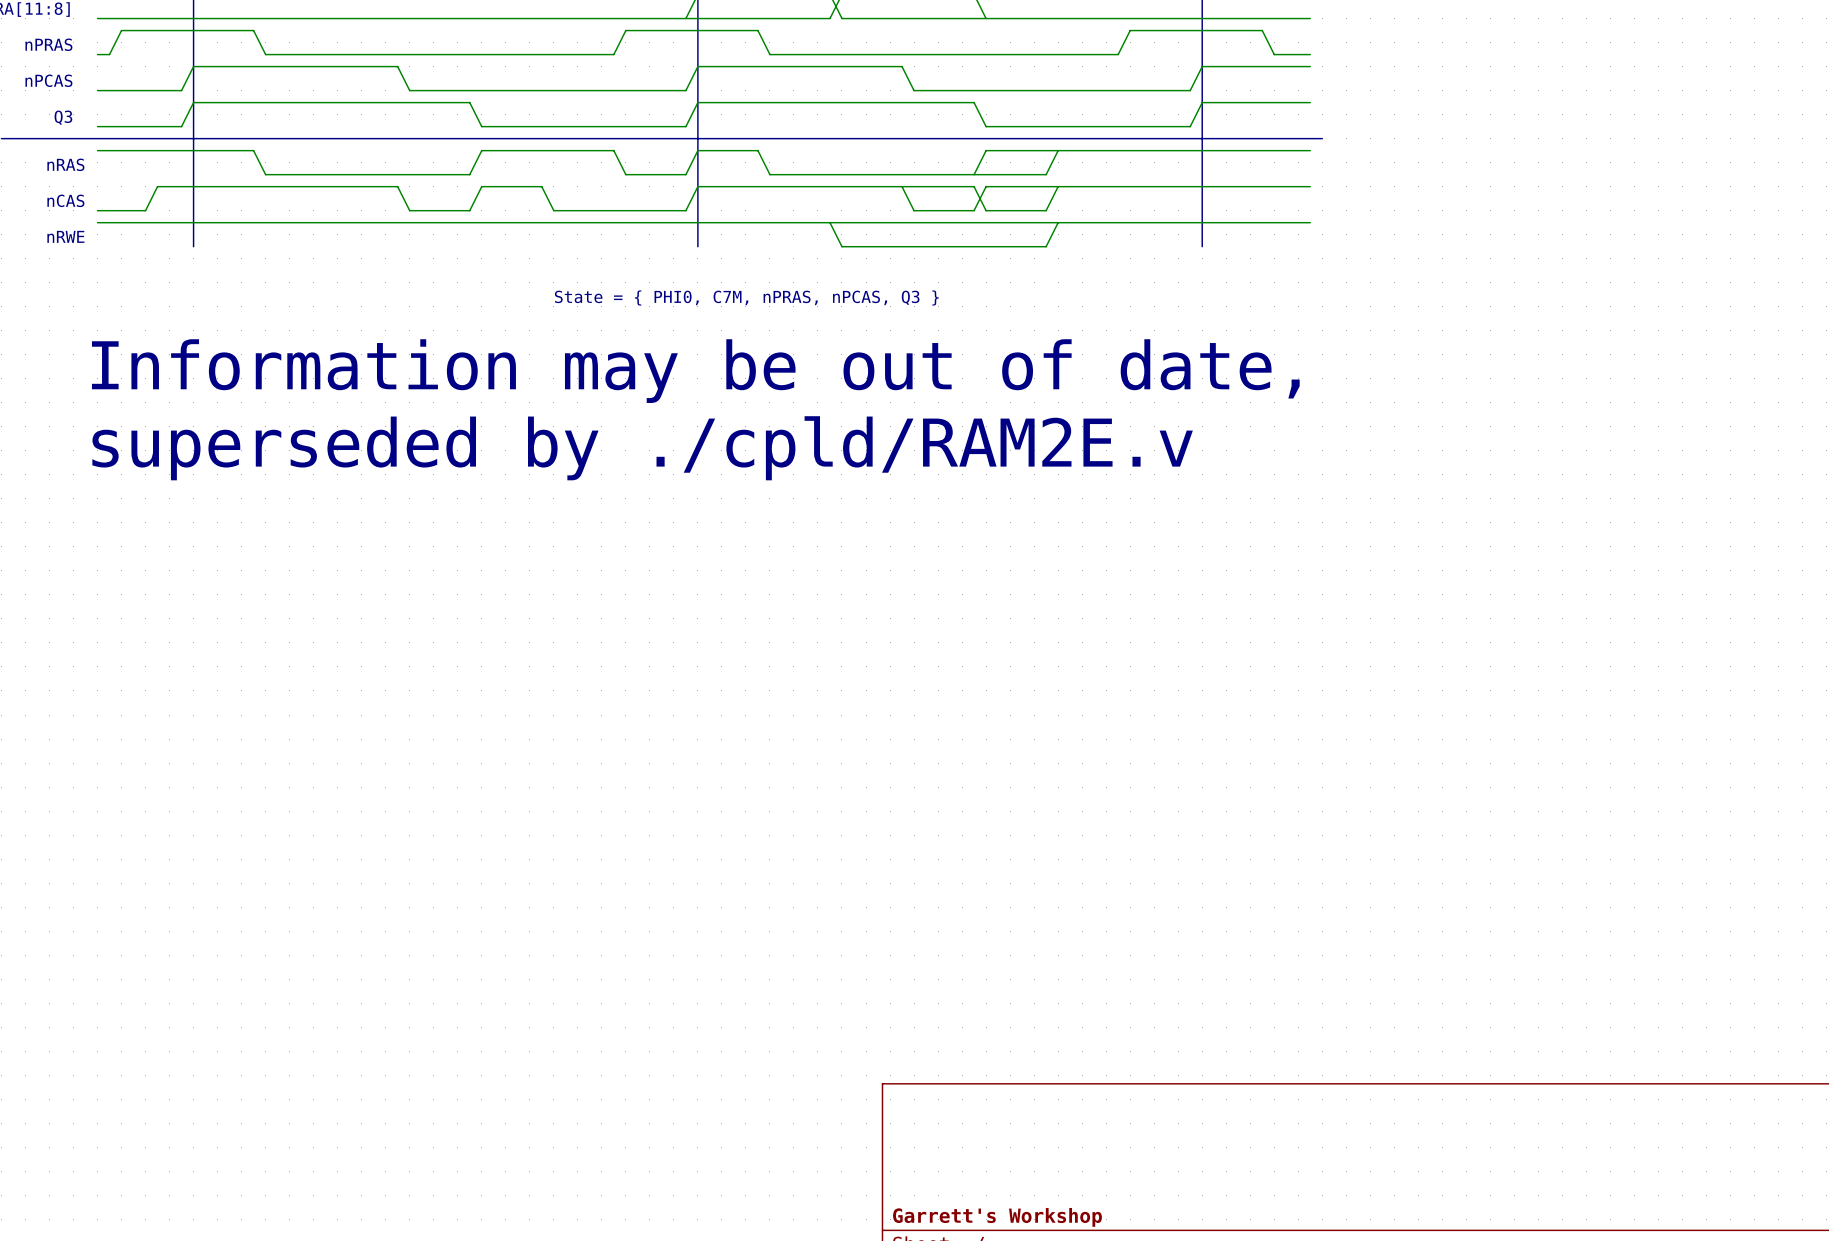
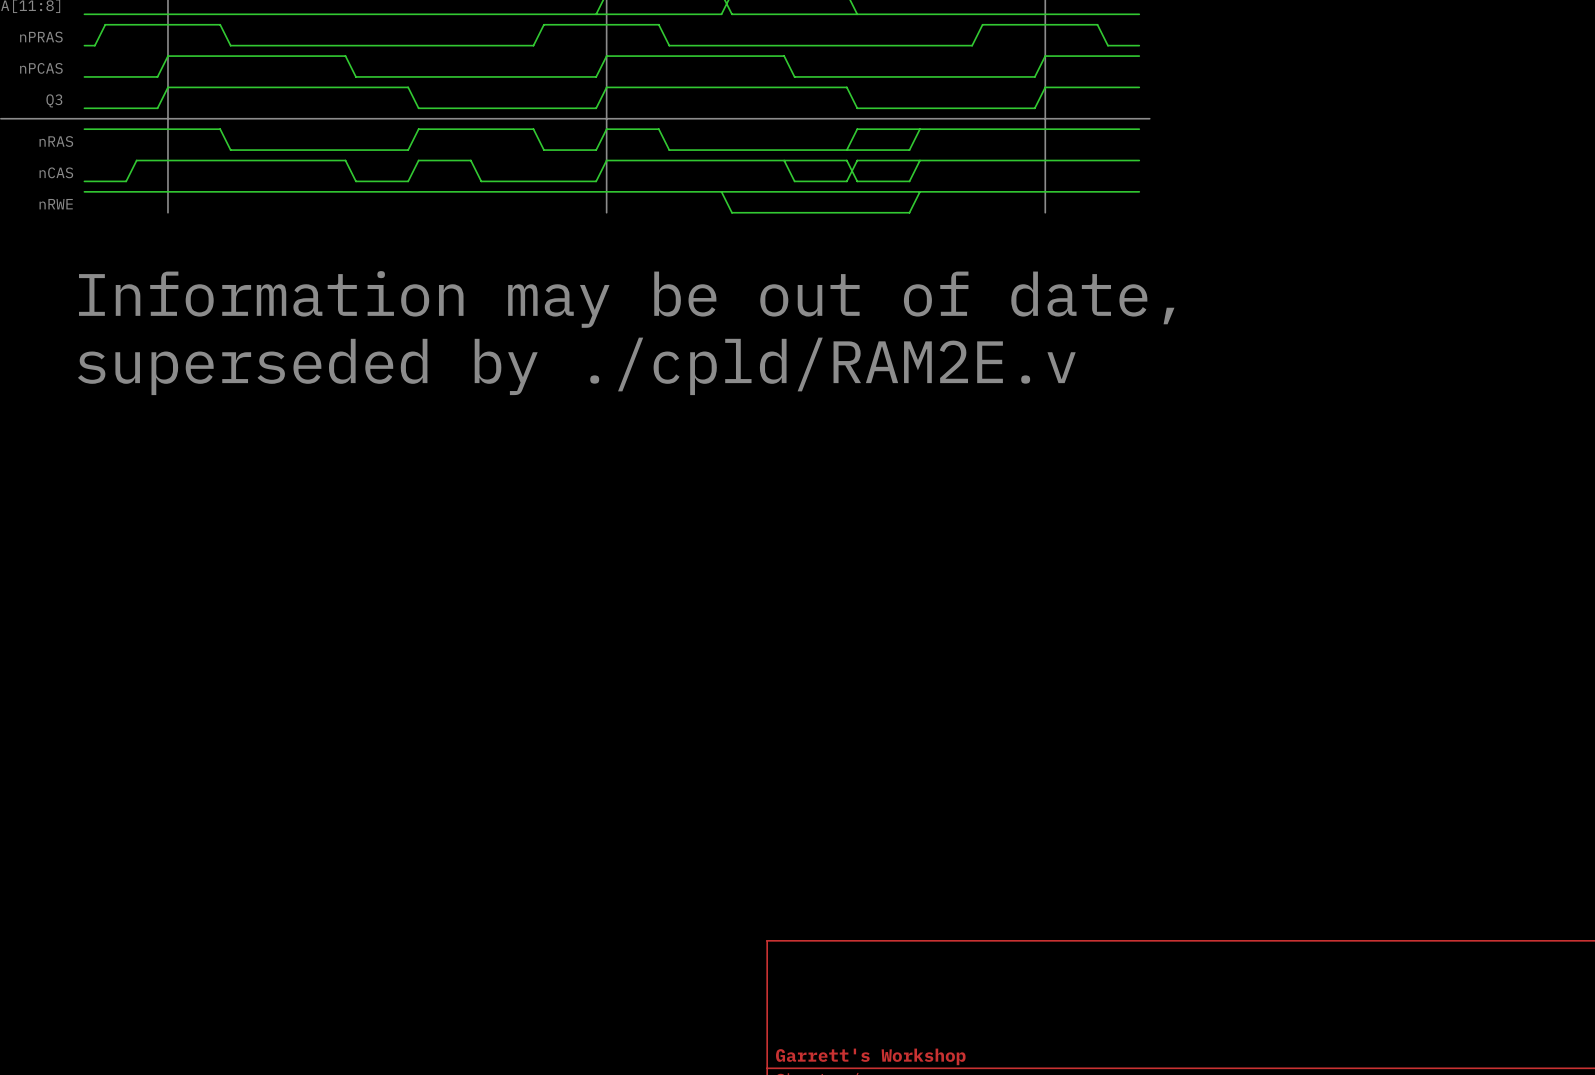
text: State = { PHI0, C7M, nPRAS, nPCAS, Q3 } (746, 297) -> none
text position: Information may be out of date, (695, 371) -> Information may be out of date, (626, 299)
text position: superseded by ./cpld/RAM2E.v (642, 448) -> superseded by ./cpld/RAM2E.v (576, 366)

